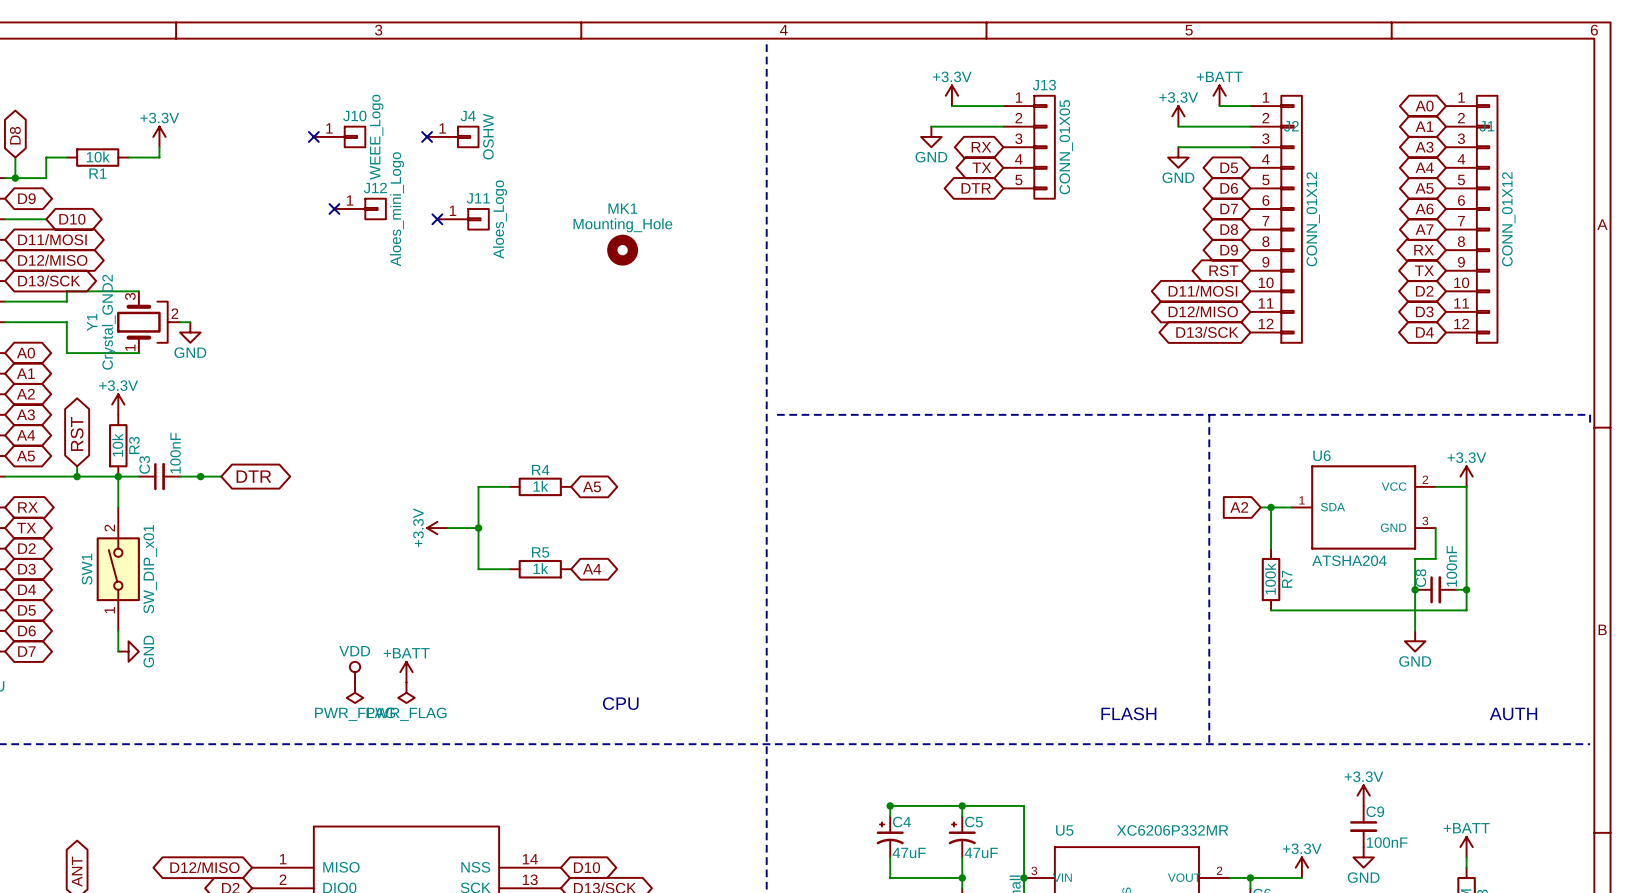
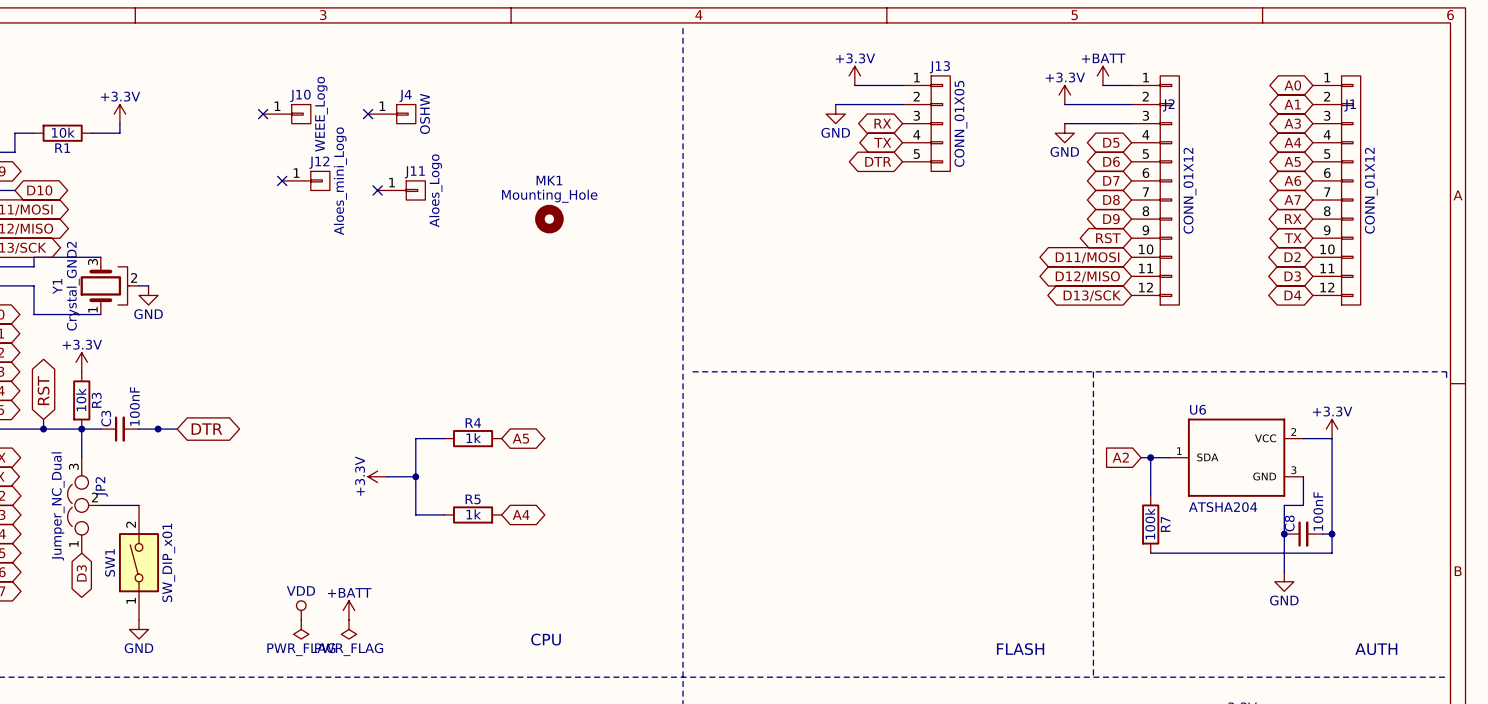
JP2: none -> Jumper_NC_Dual (84, 505)
wire: none -> (100, 505) (139, 505)
SW1 position: (118, 569) -> (139, 562)
wire: (118, 630) (118, 651) -> none
global label: none -> D3 (81, 573)
power symbol rotation: 0° (128, 651) -> 90° clockwise (139, 629)
power symbol position: GND (128, 651) -> GND (139, 629)

